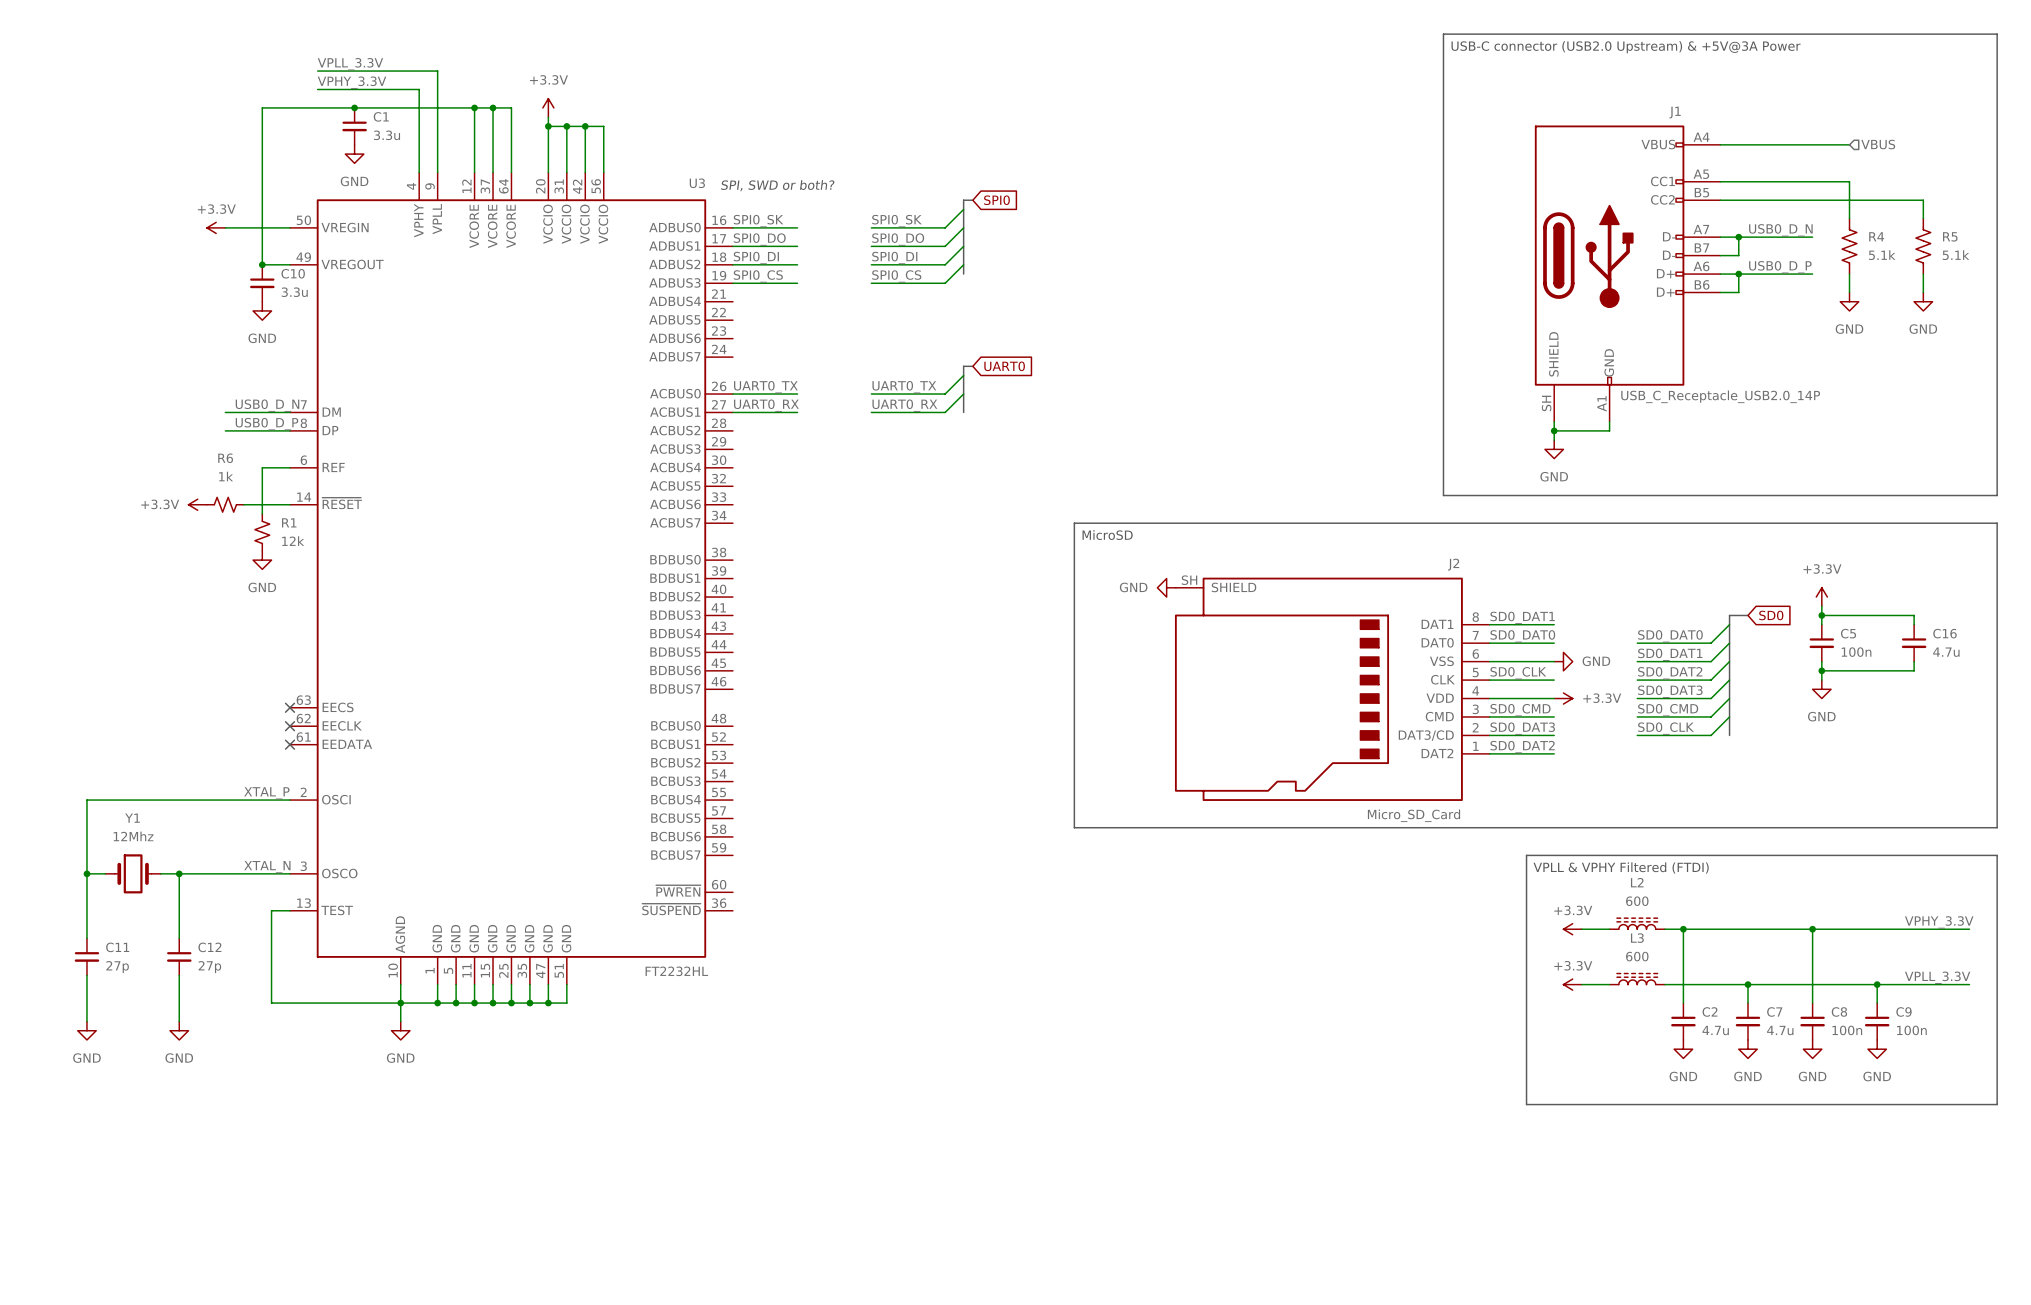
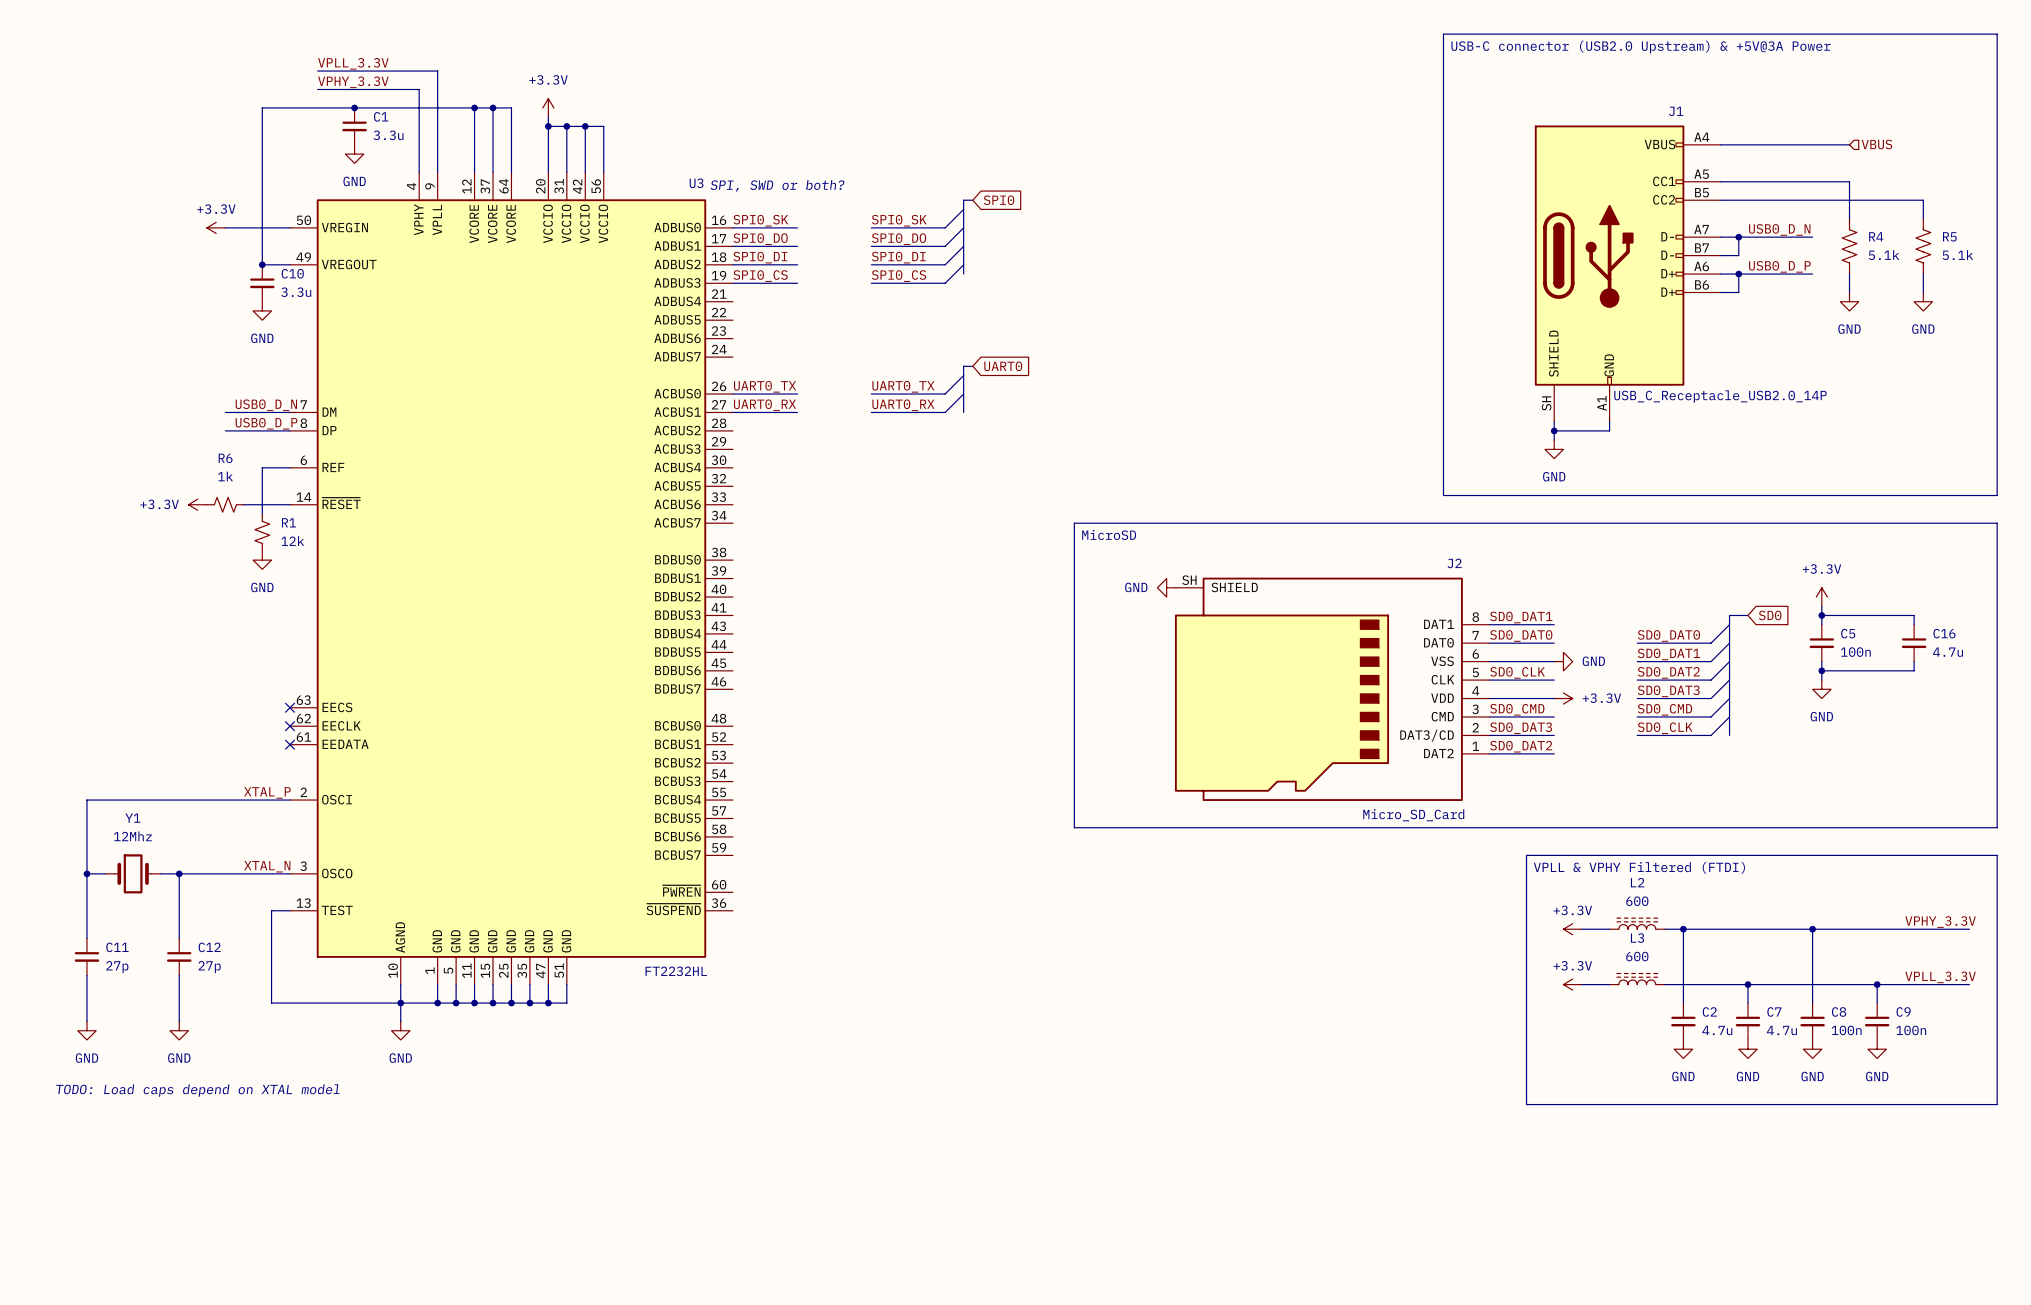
text: none -> TODO: Load caps depend on XTAL model (197, 1090)

